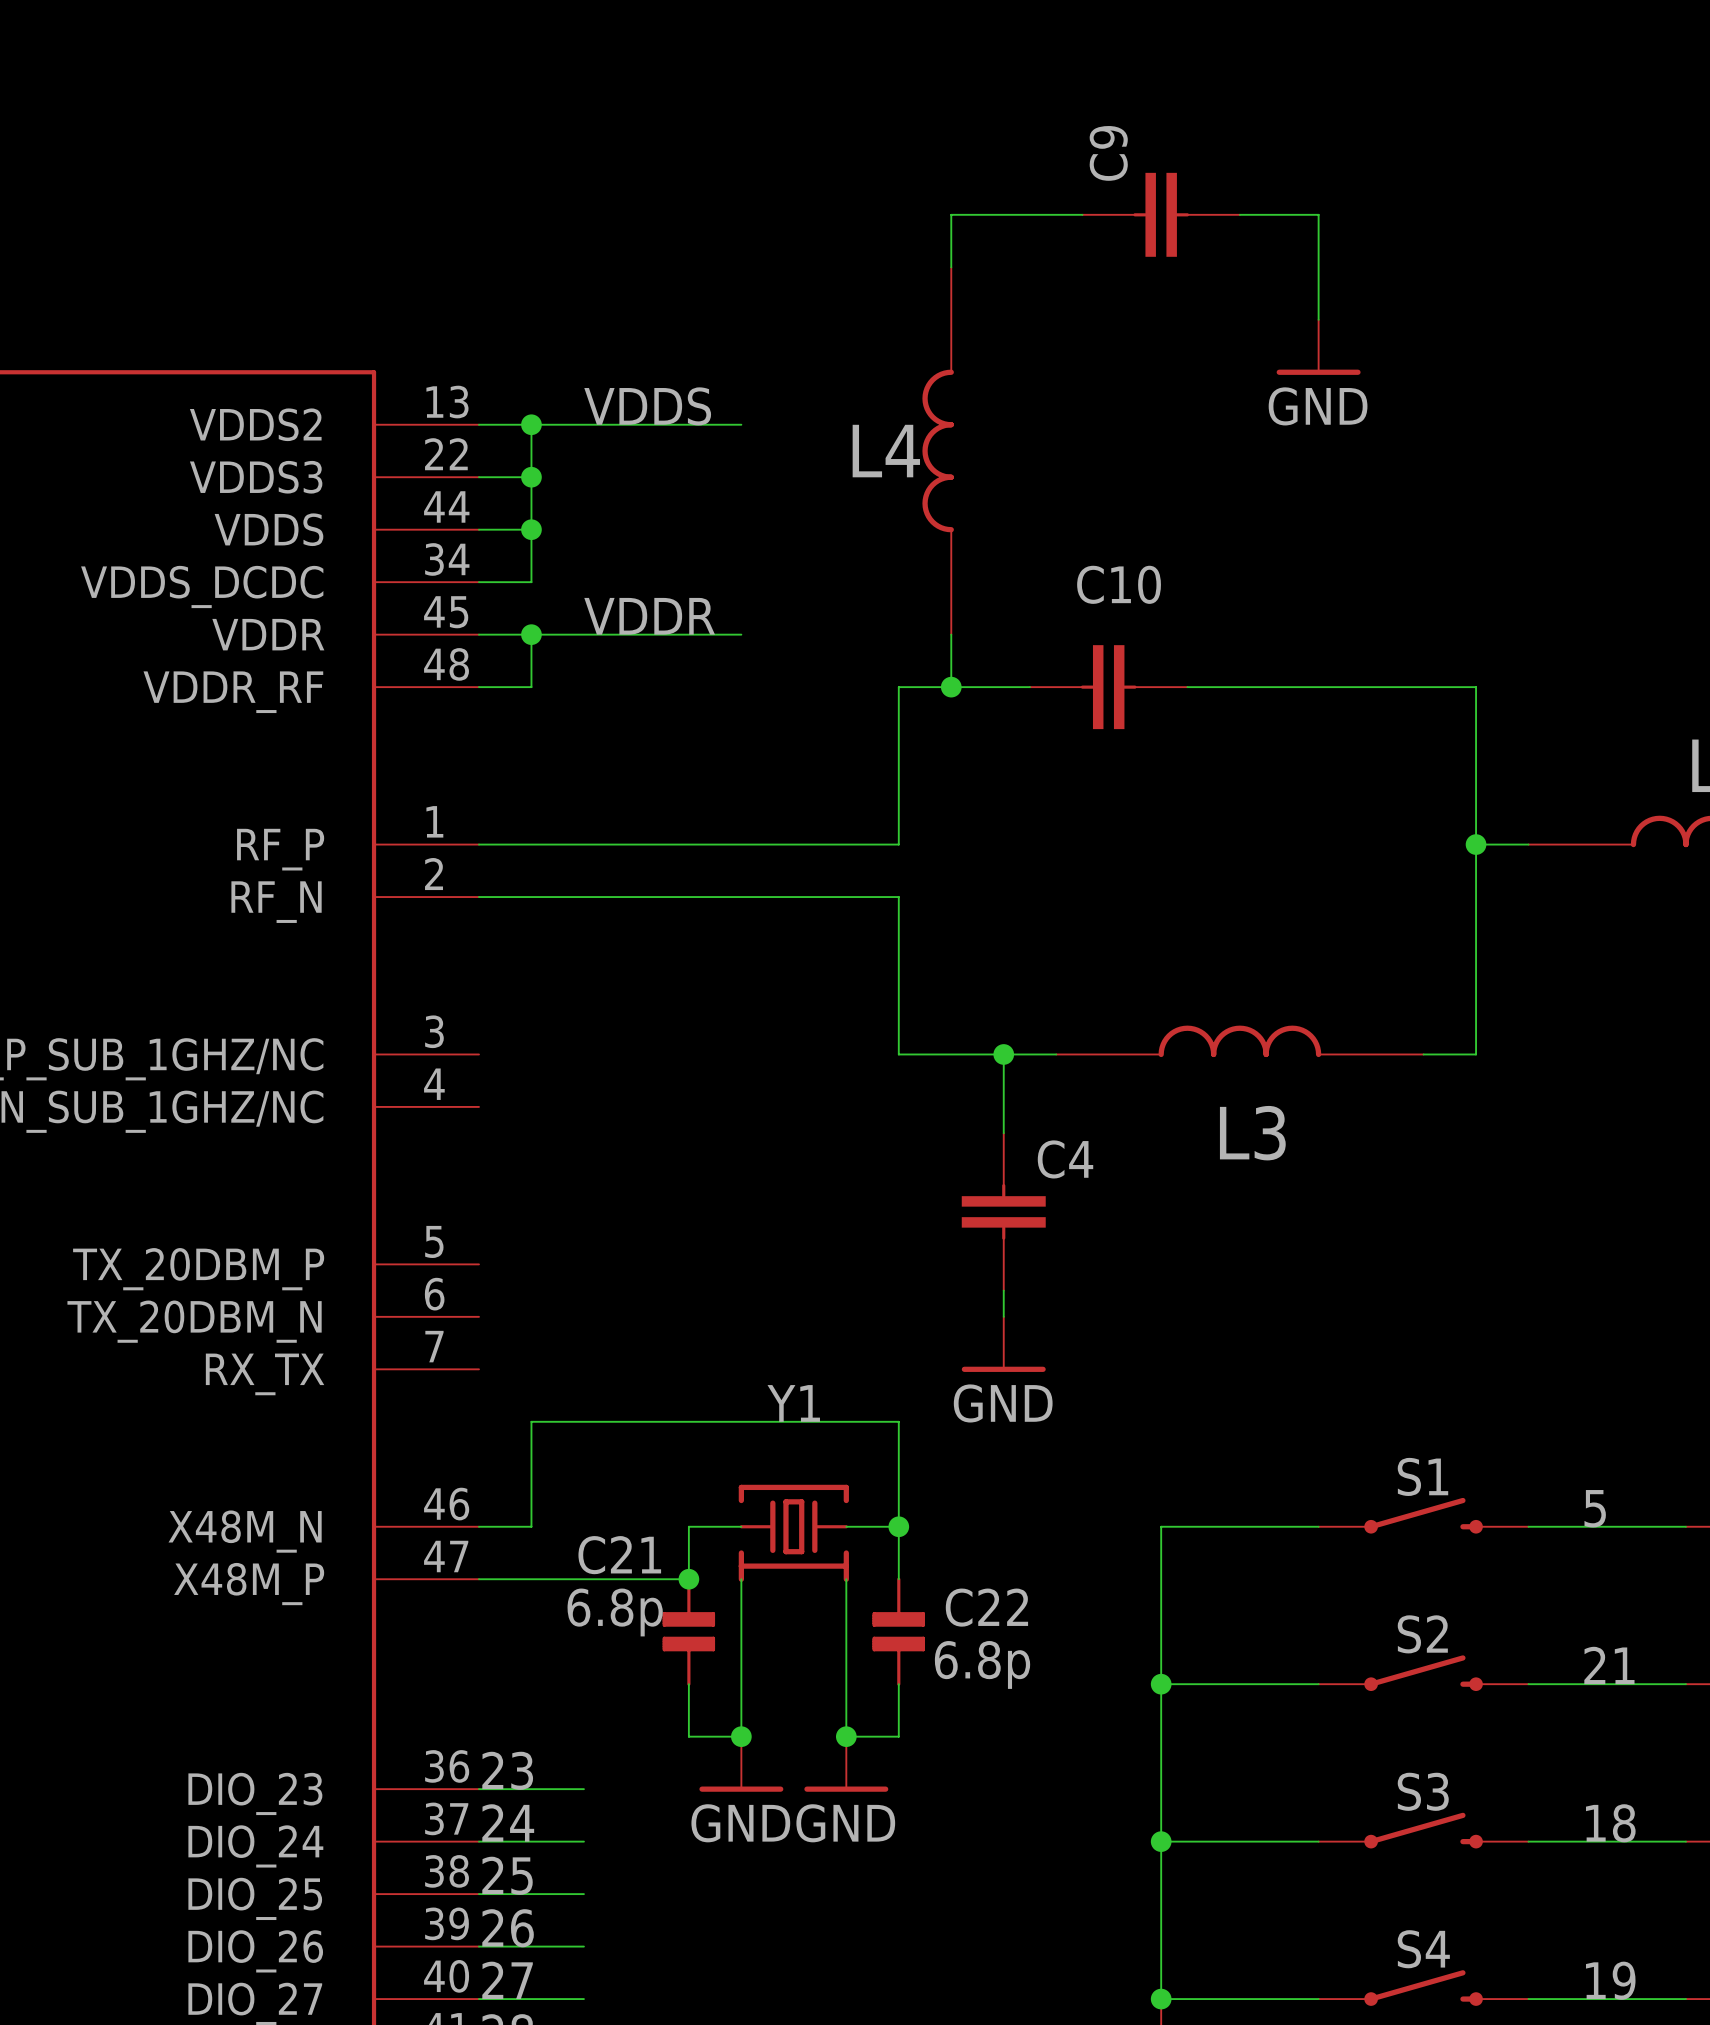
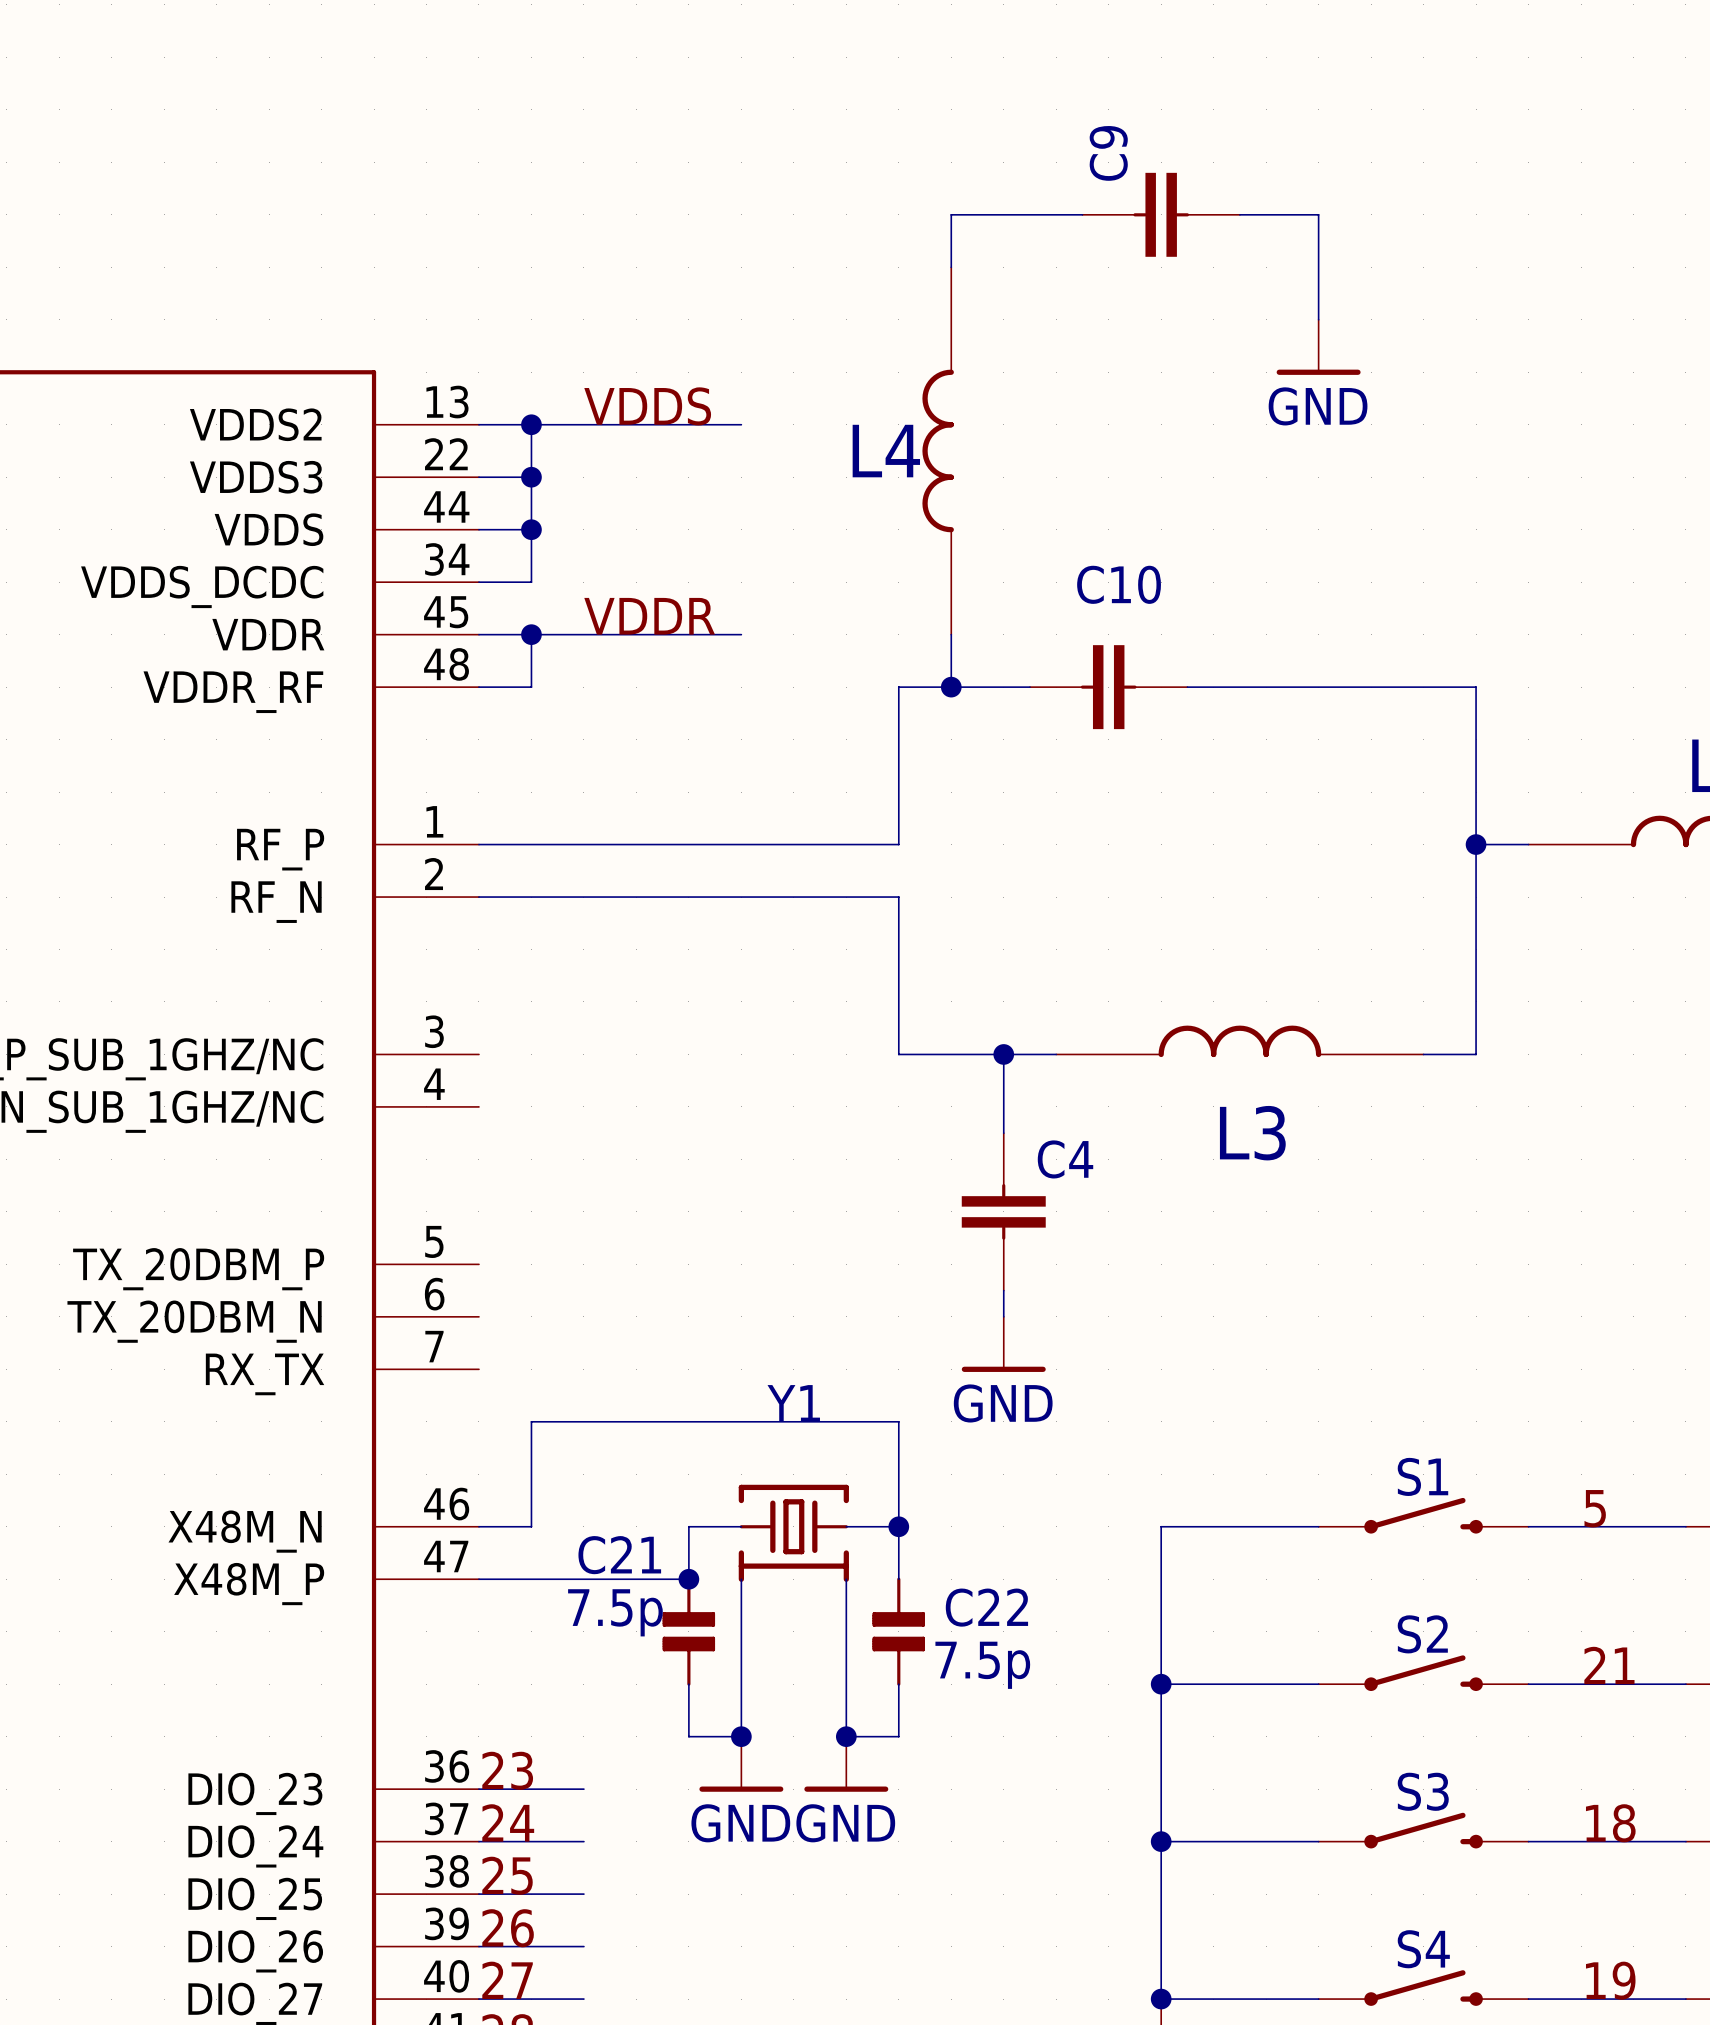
C21 value: 6.8p (615, 1612) -> 7.5p (615, 1612)
C22 value: 6.8p (982, 1664) -> 7.5p (982, 1665)

